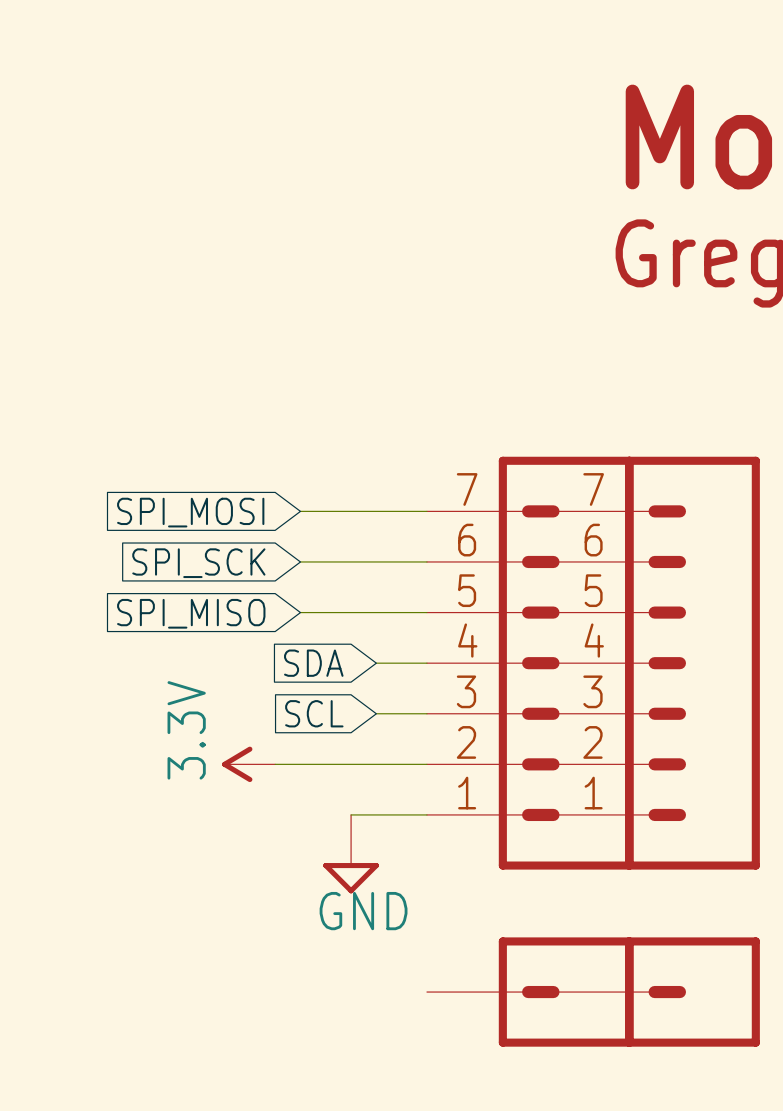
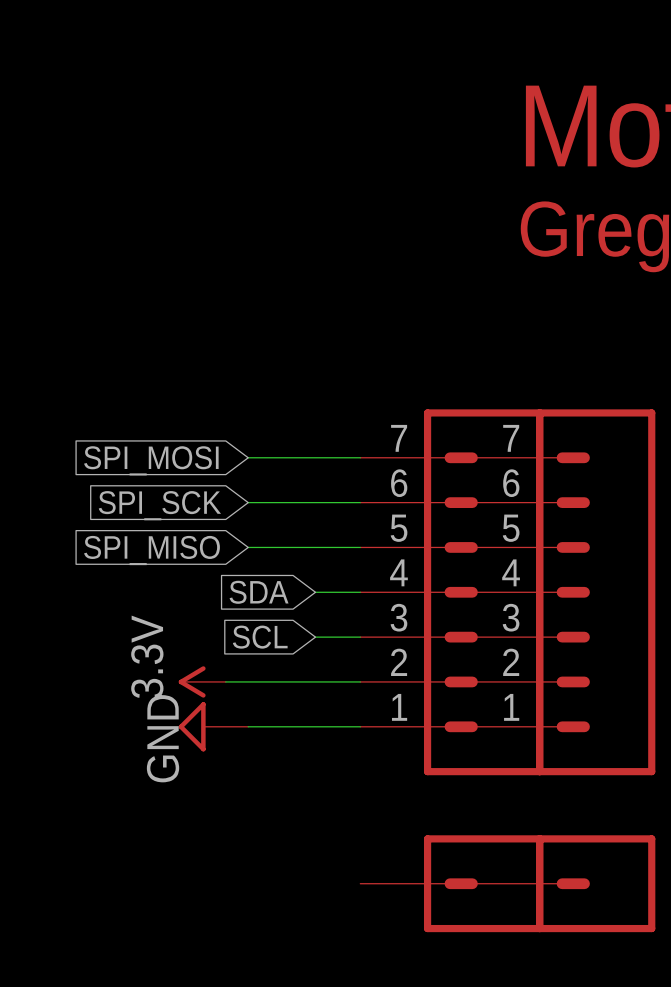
wire: none -> (248, 726) (293, 726)
power symbol position: GND (351, 854) -> GND (213, 726)
power symbol rotation: 0° (351, 878) -> 90° clockwise (192, 726)

